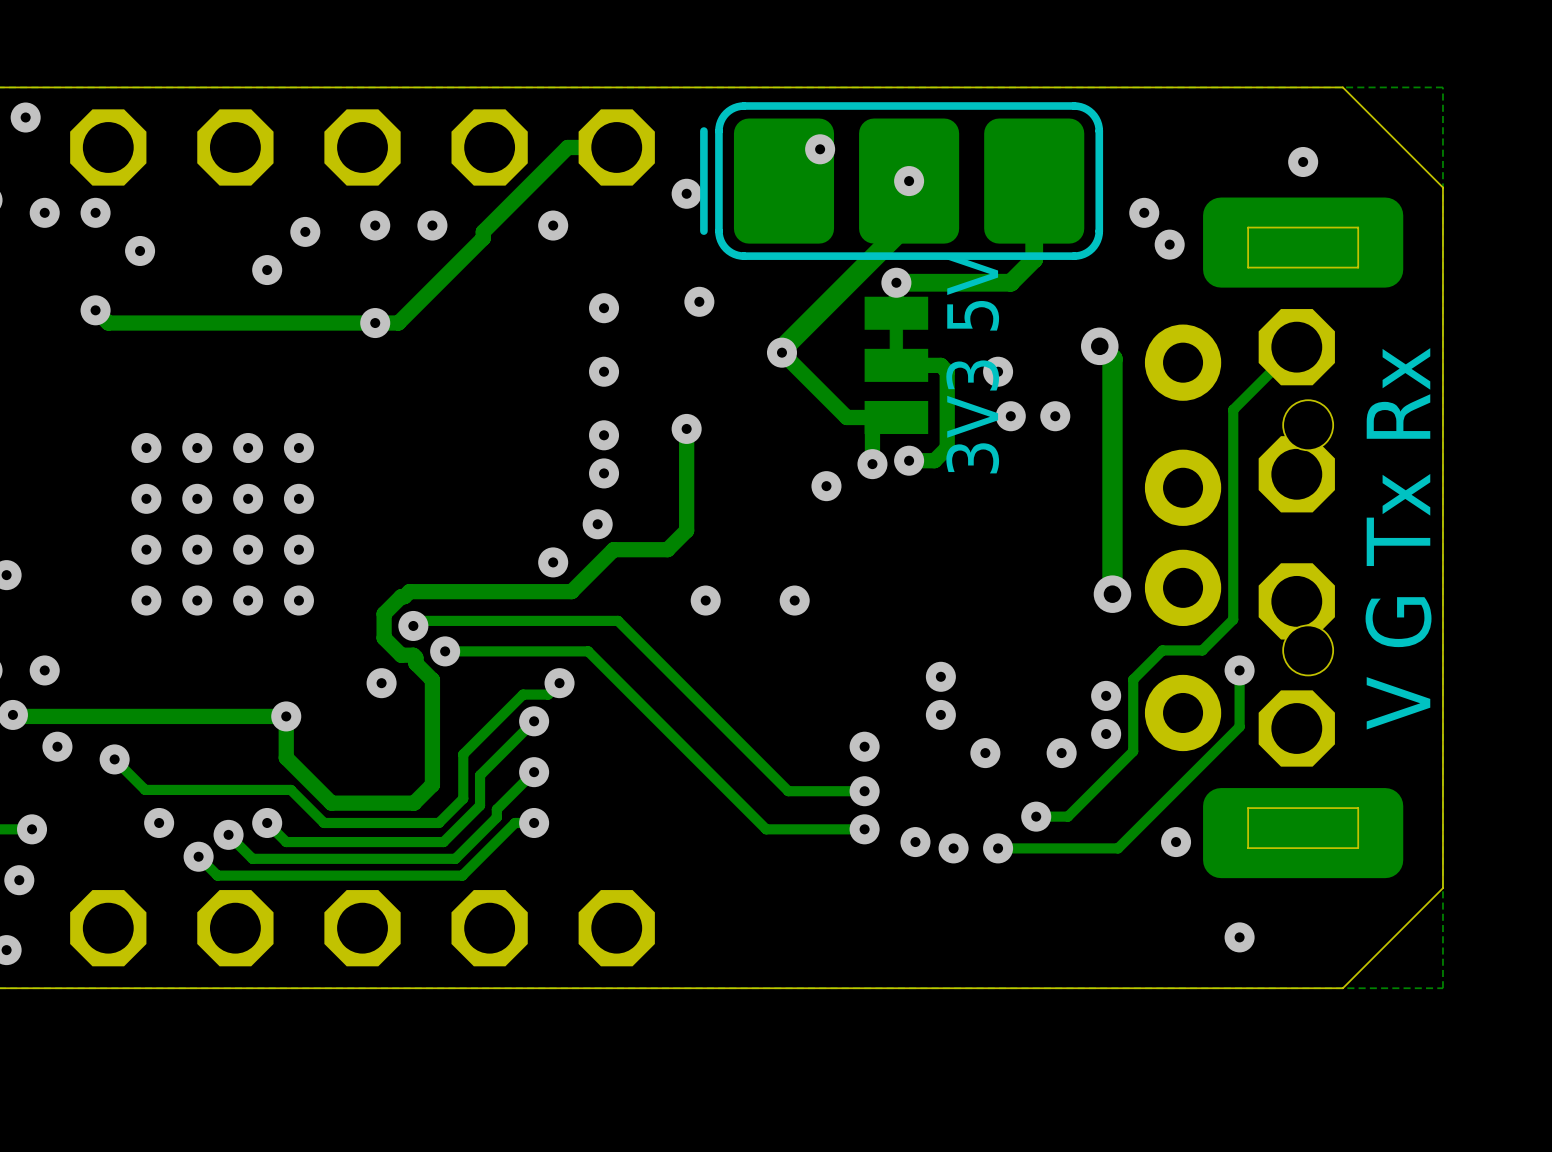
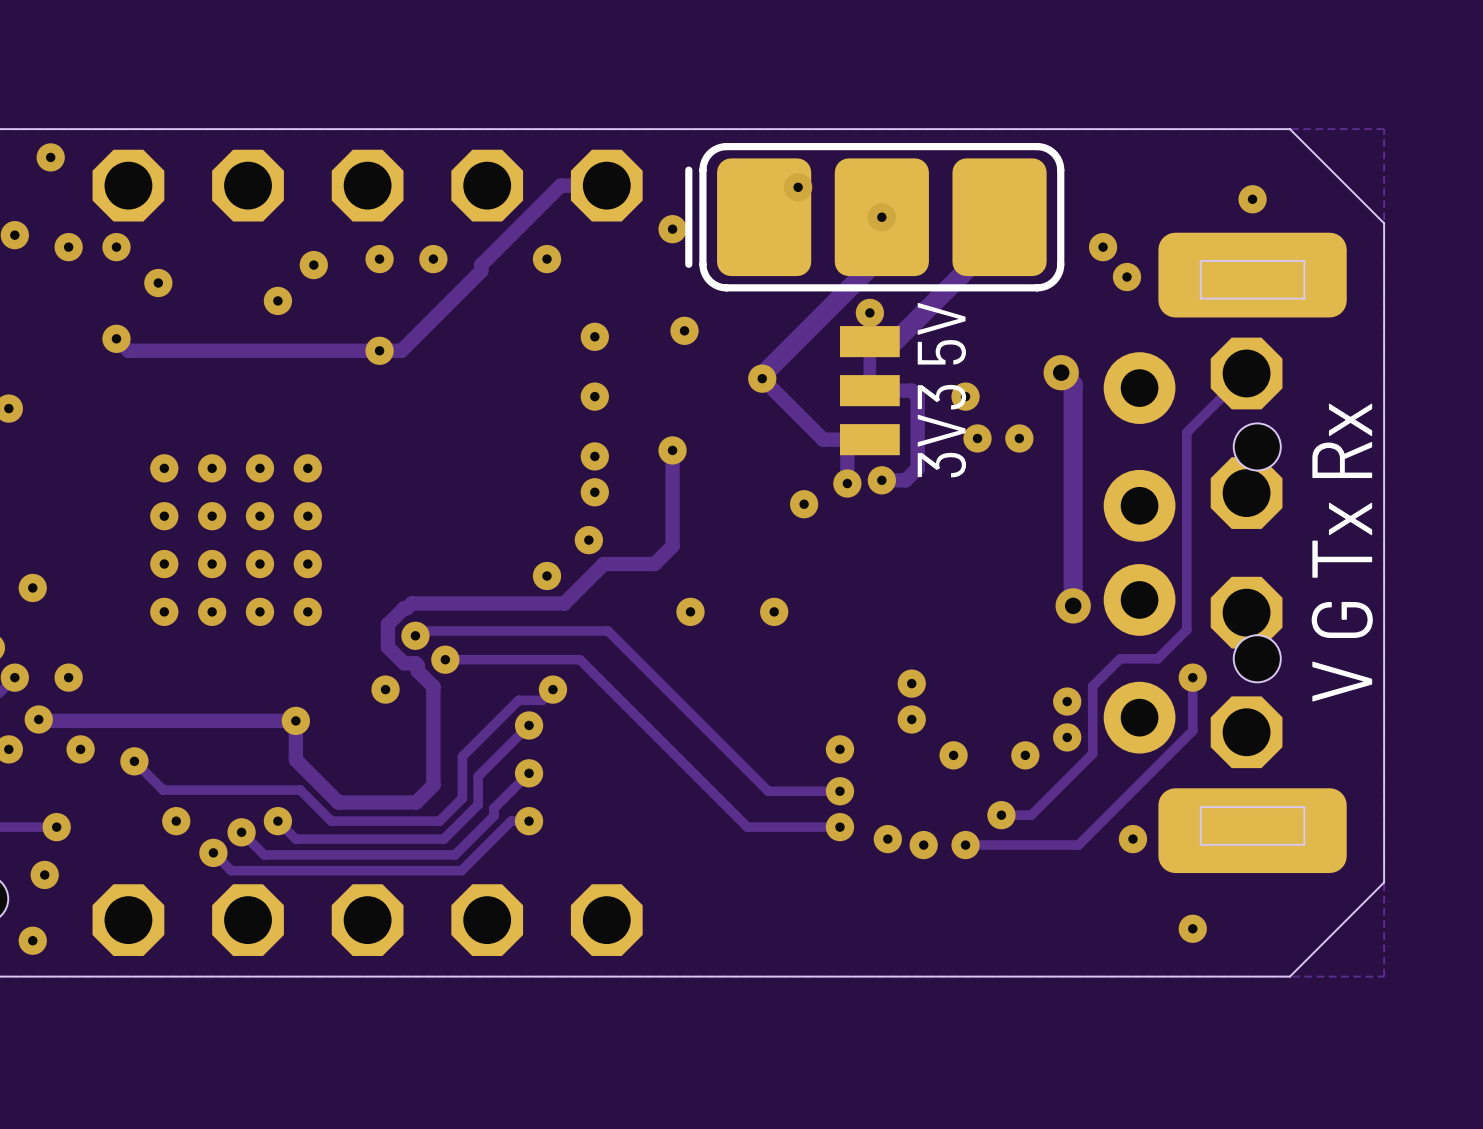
track: (1034, 202) (1034, 259) (1010, 282) (896, 282) -> (999, 237) (895, 341)

